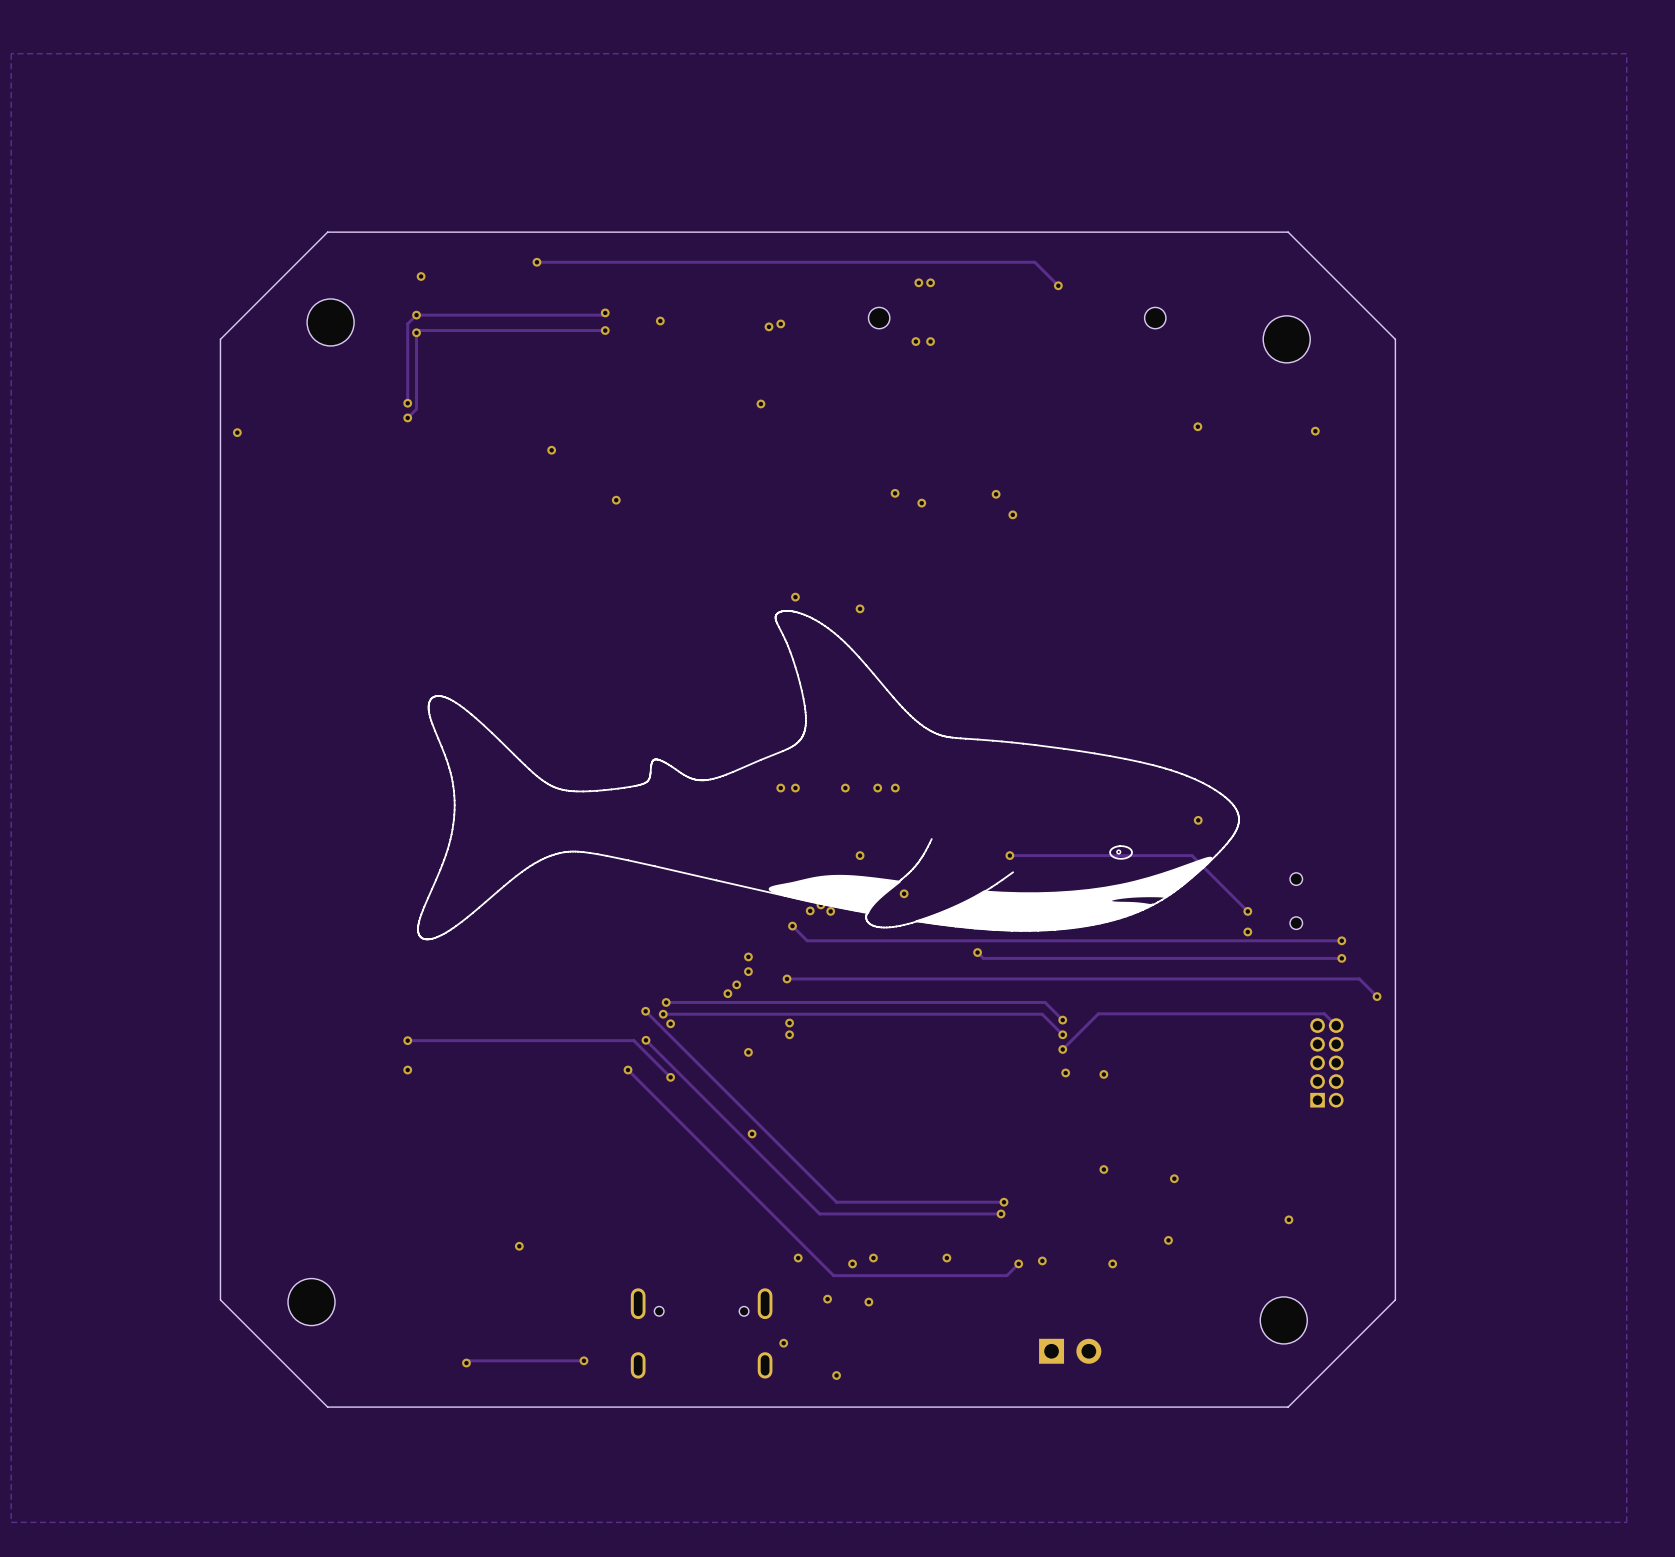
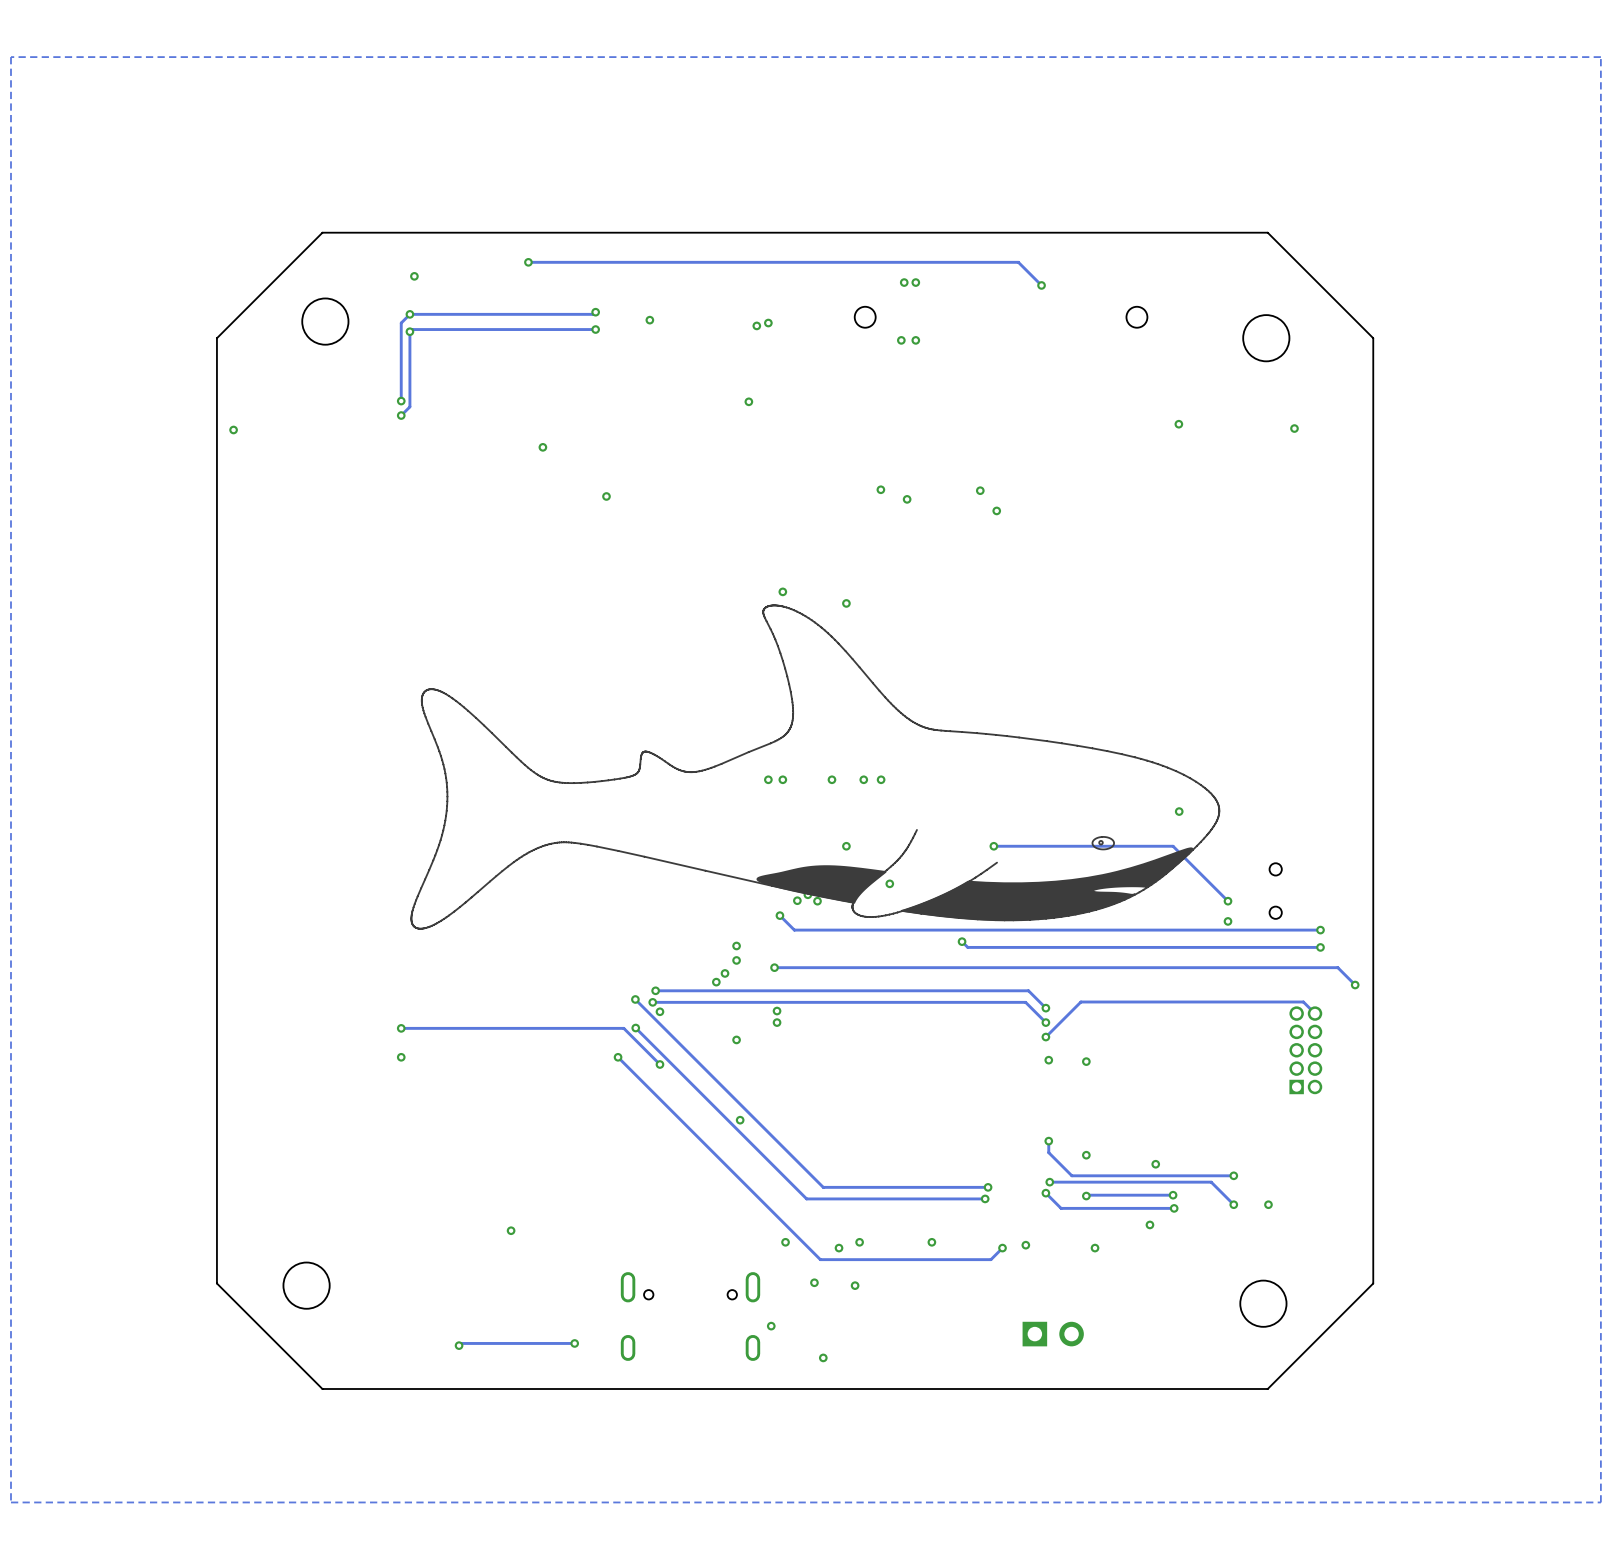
track: none -> (1048, 1141) (1048, 1152) (1071, 1175) (1233, 1175)
via: none -> (1048, 1141)
via: none -> (1233, 1175)
track: none -> (1049, 1182) (1211, 1182) (1233, 1204)
via: none -> (1049, 1182)
track: none -> (1045, 1193) (1061, 1208) (1174, 1208)
via: none -> (1045, 1193)
track: none -> (1173, 1195) (1086, 1196)
via: none -> (1173, 1195)
via: none -> (1086, 1196)
via: none -> (1233, 1204)
via: none -> (1174, 1208)

